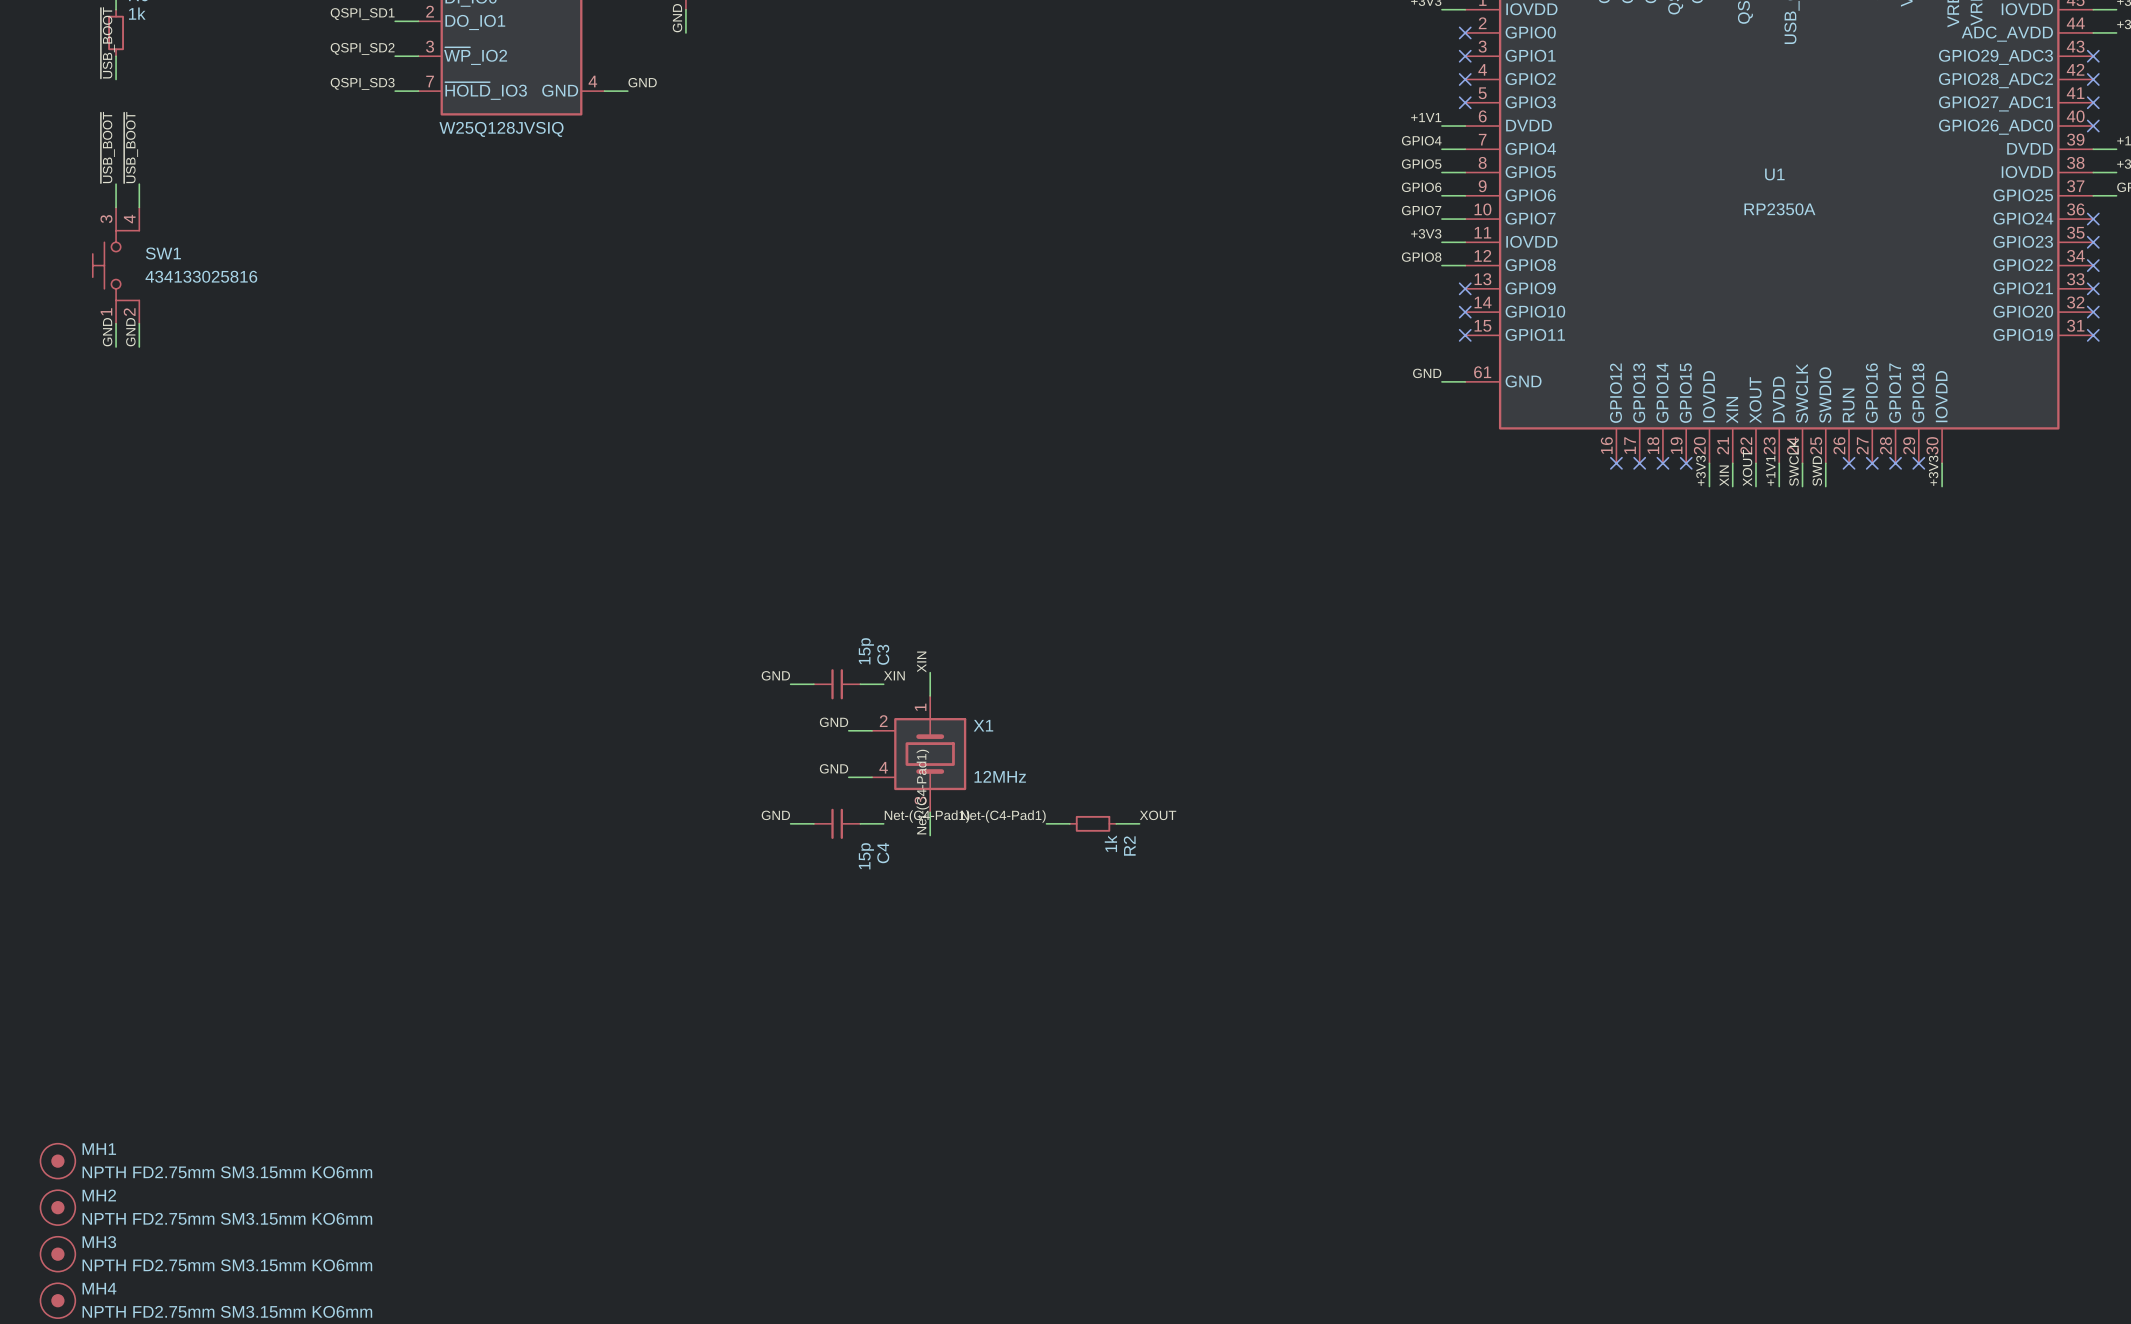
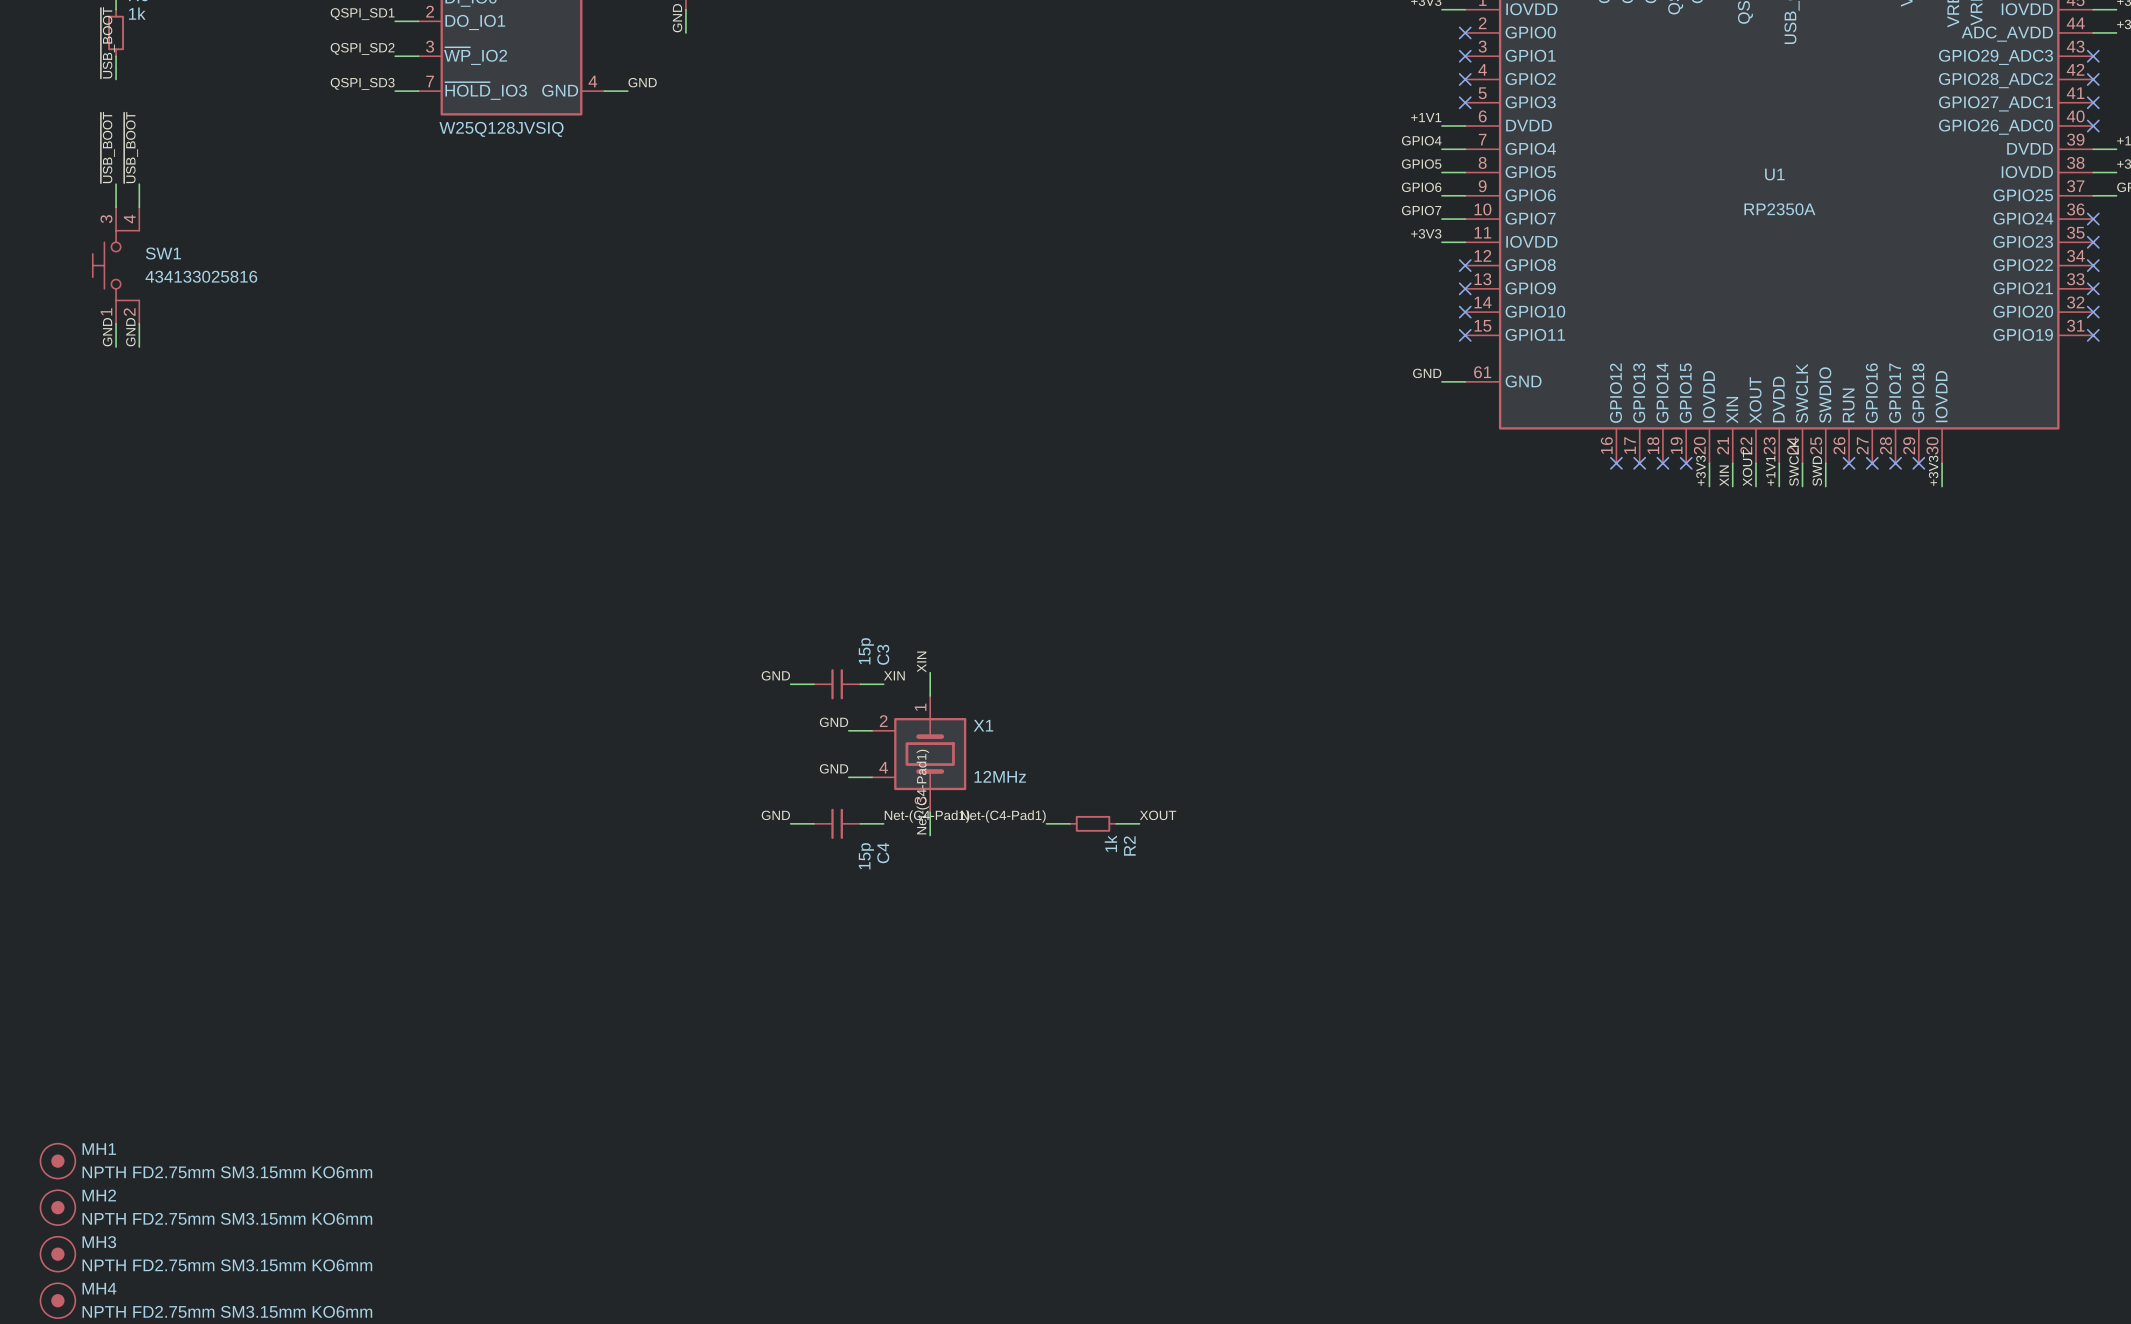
label: GPIO8 (1421, 257) -> none
wire: (1441, 265) (1465, 265) -> none
no-connect mark: none -> (1465, 265)

